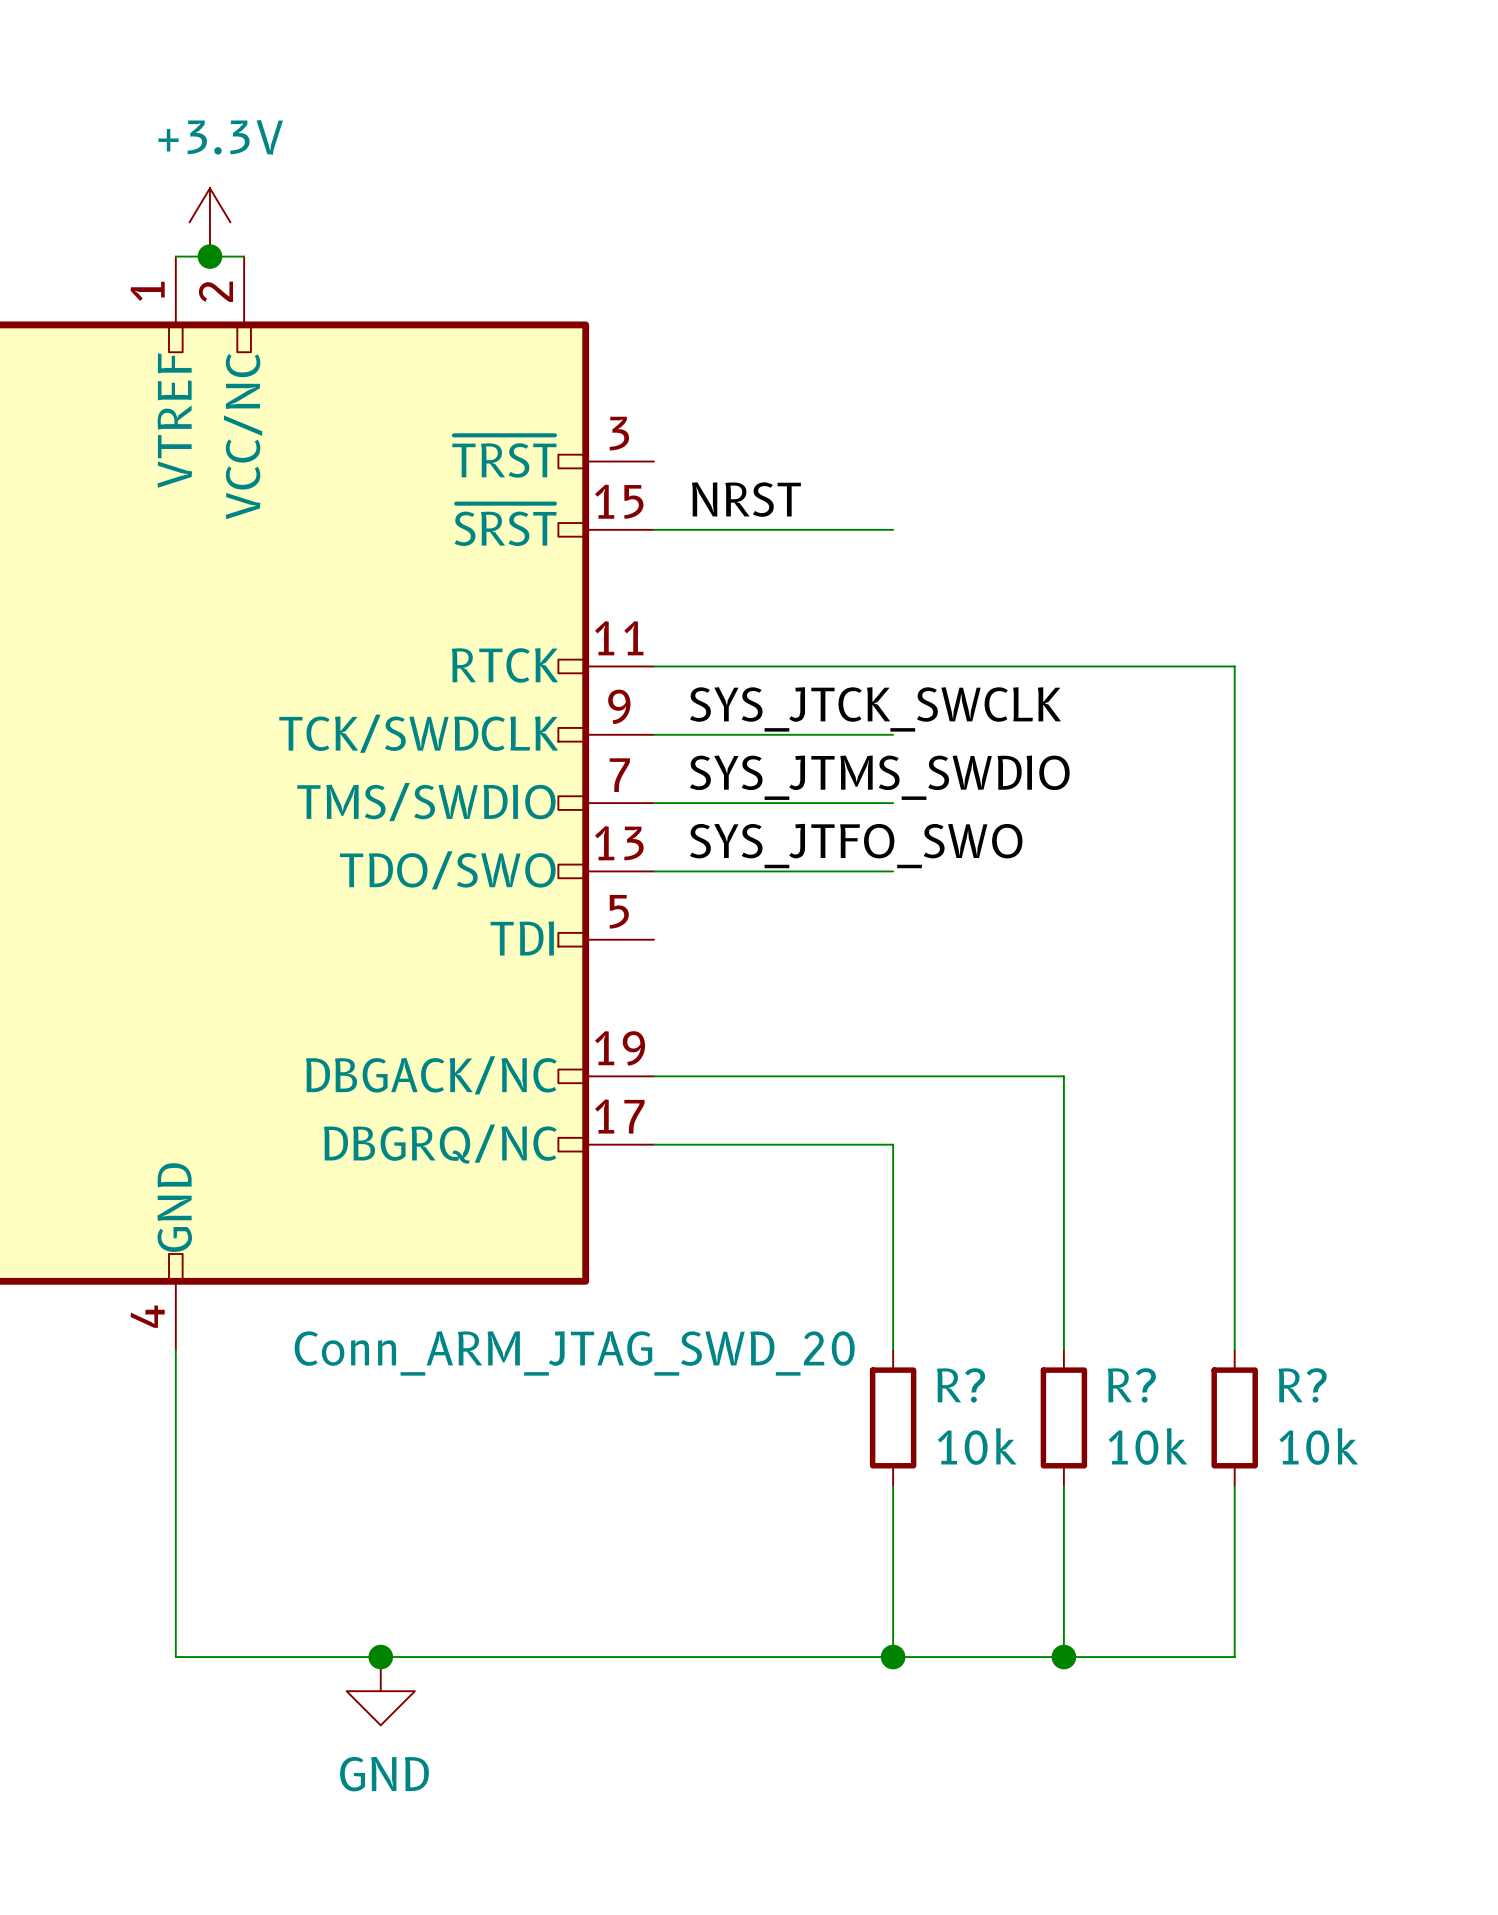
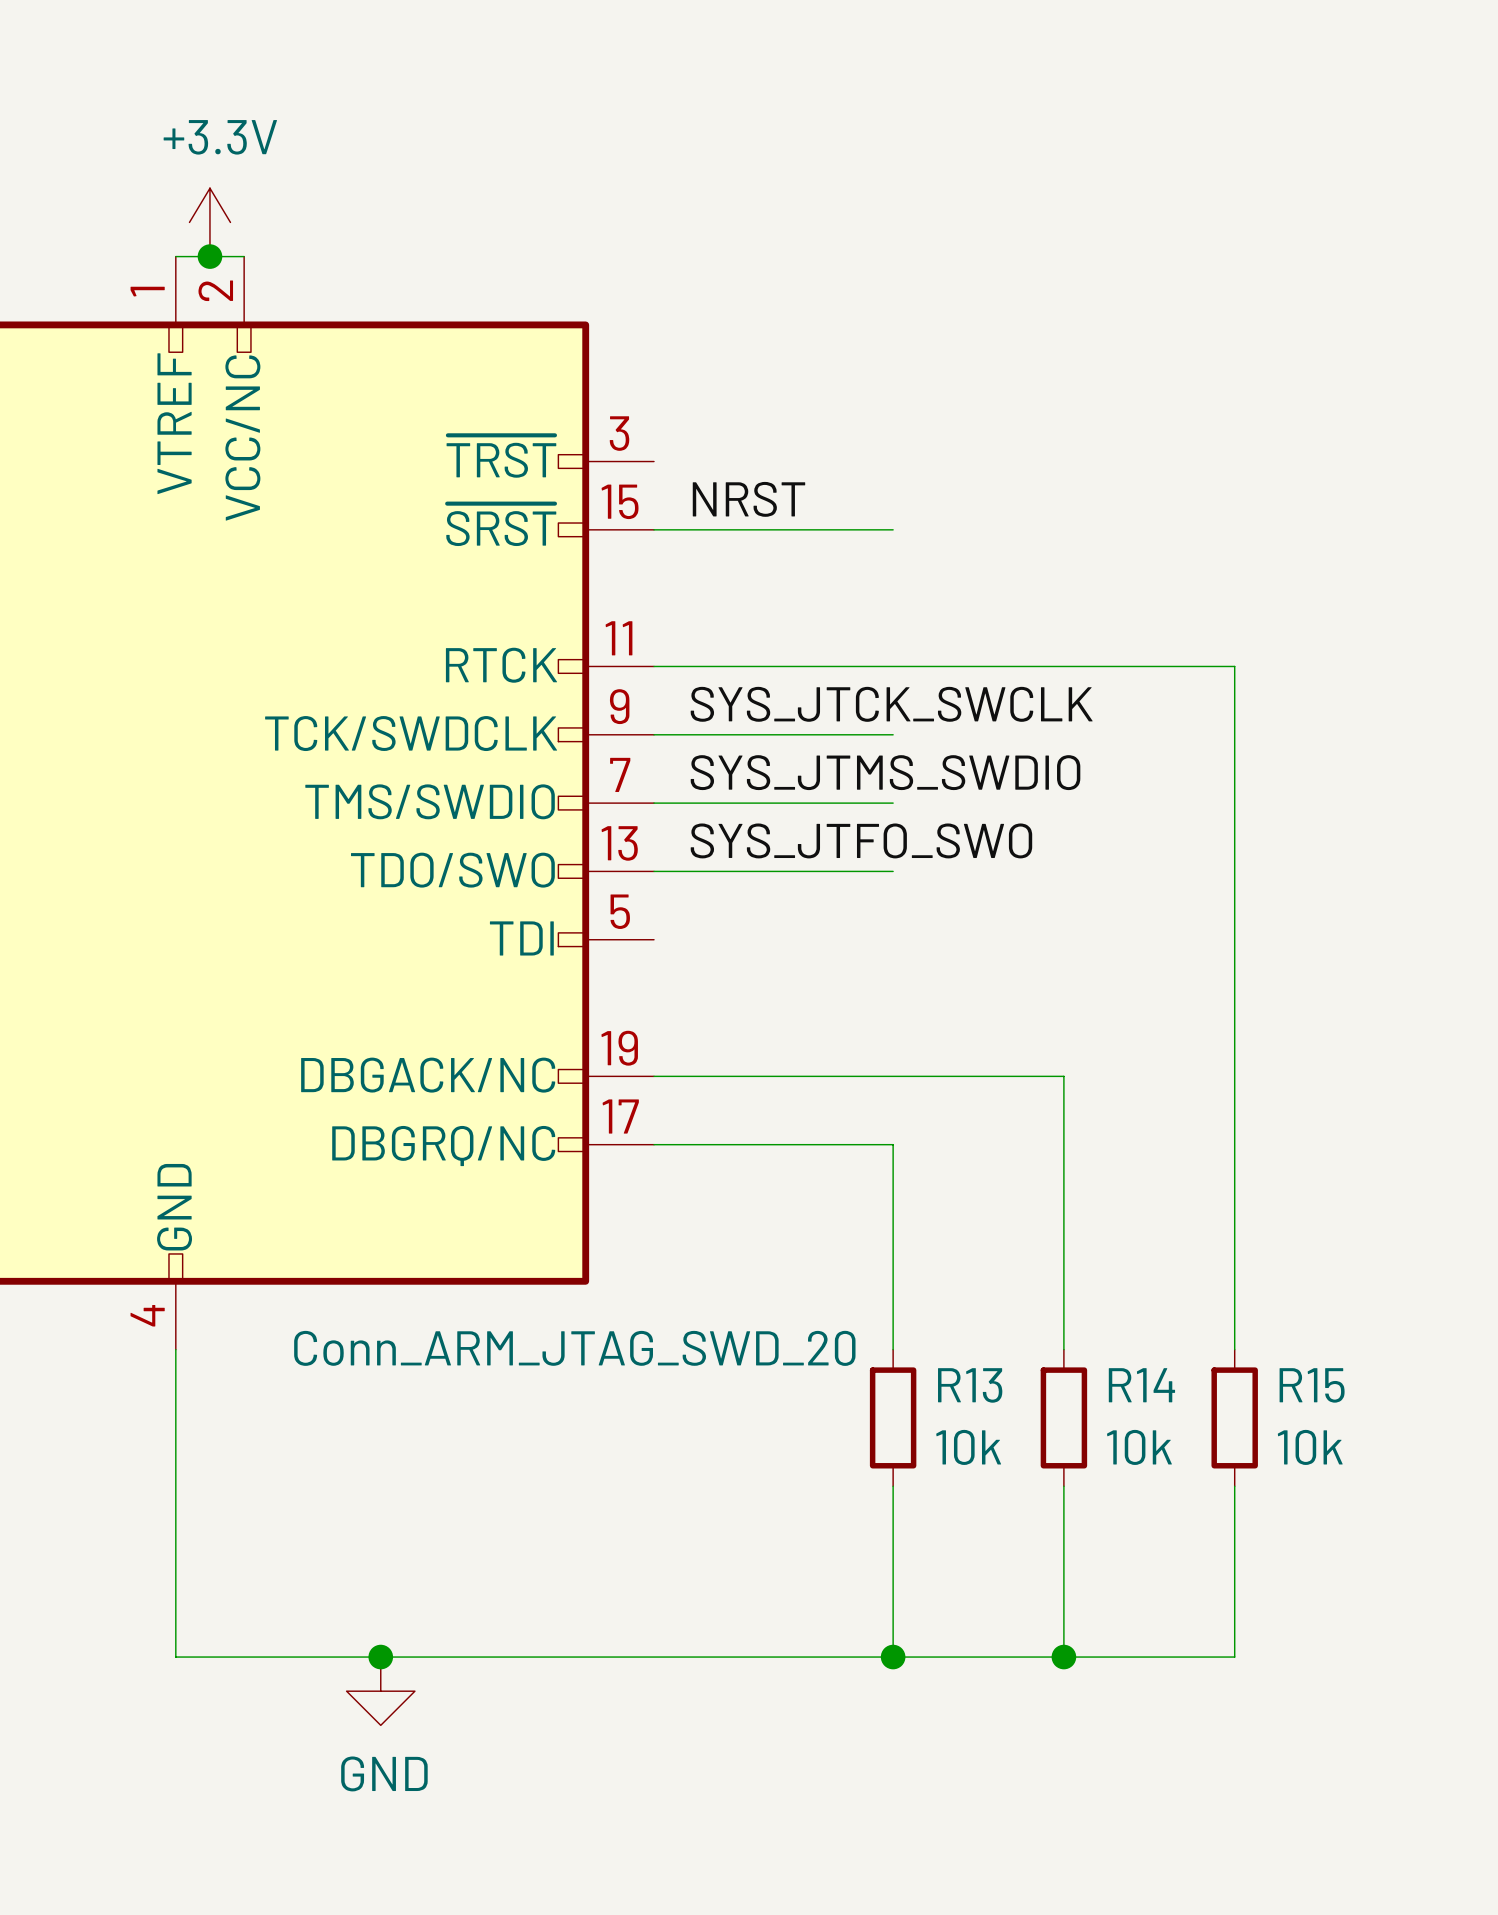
R? name: R? (961, 1385) -> R13 (970, 1385)
R? name: R? (1131, 1385) -> R14 (1141, 1385)
R? name: R? (1302, 1385) -> R15 (1312, 1385)

